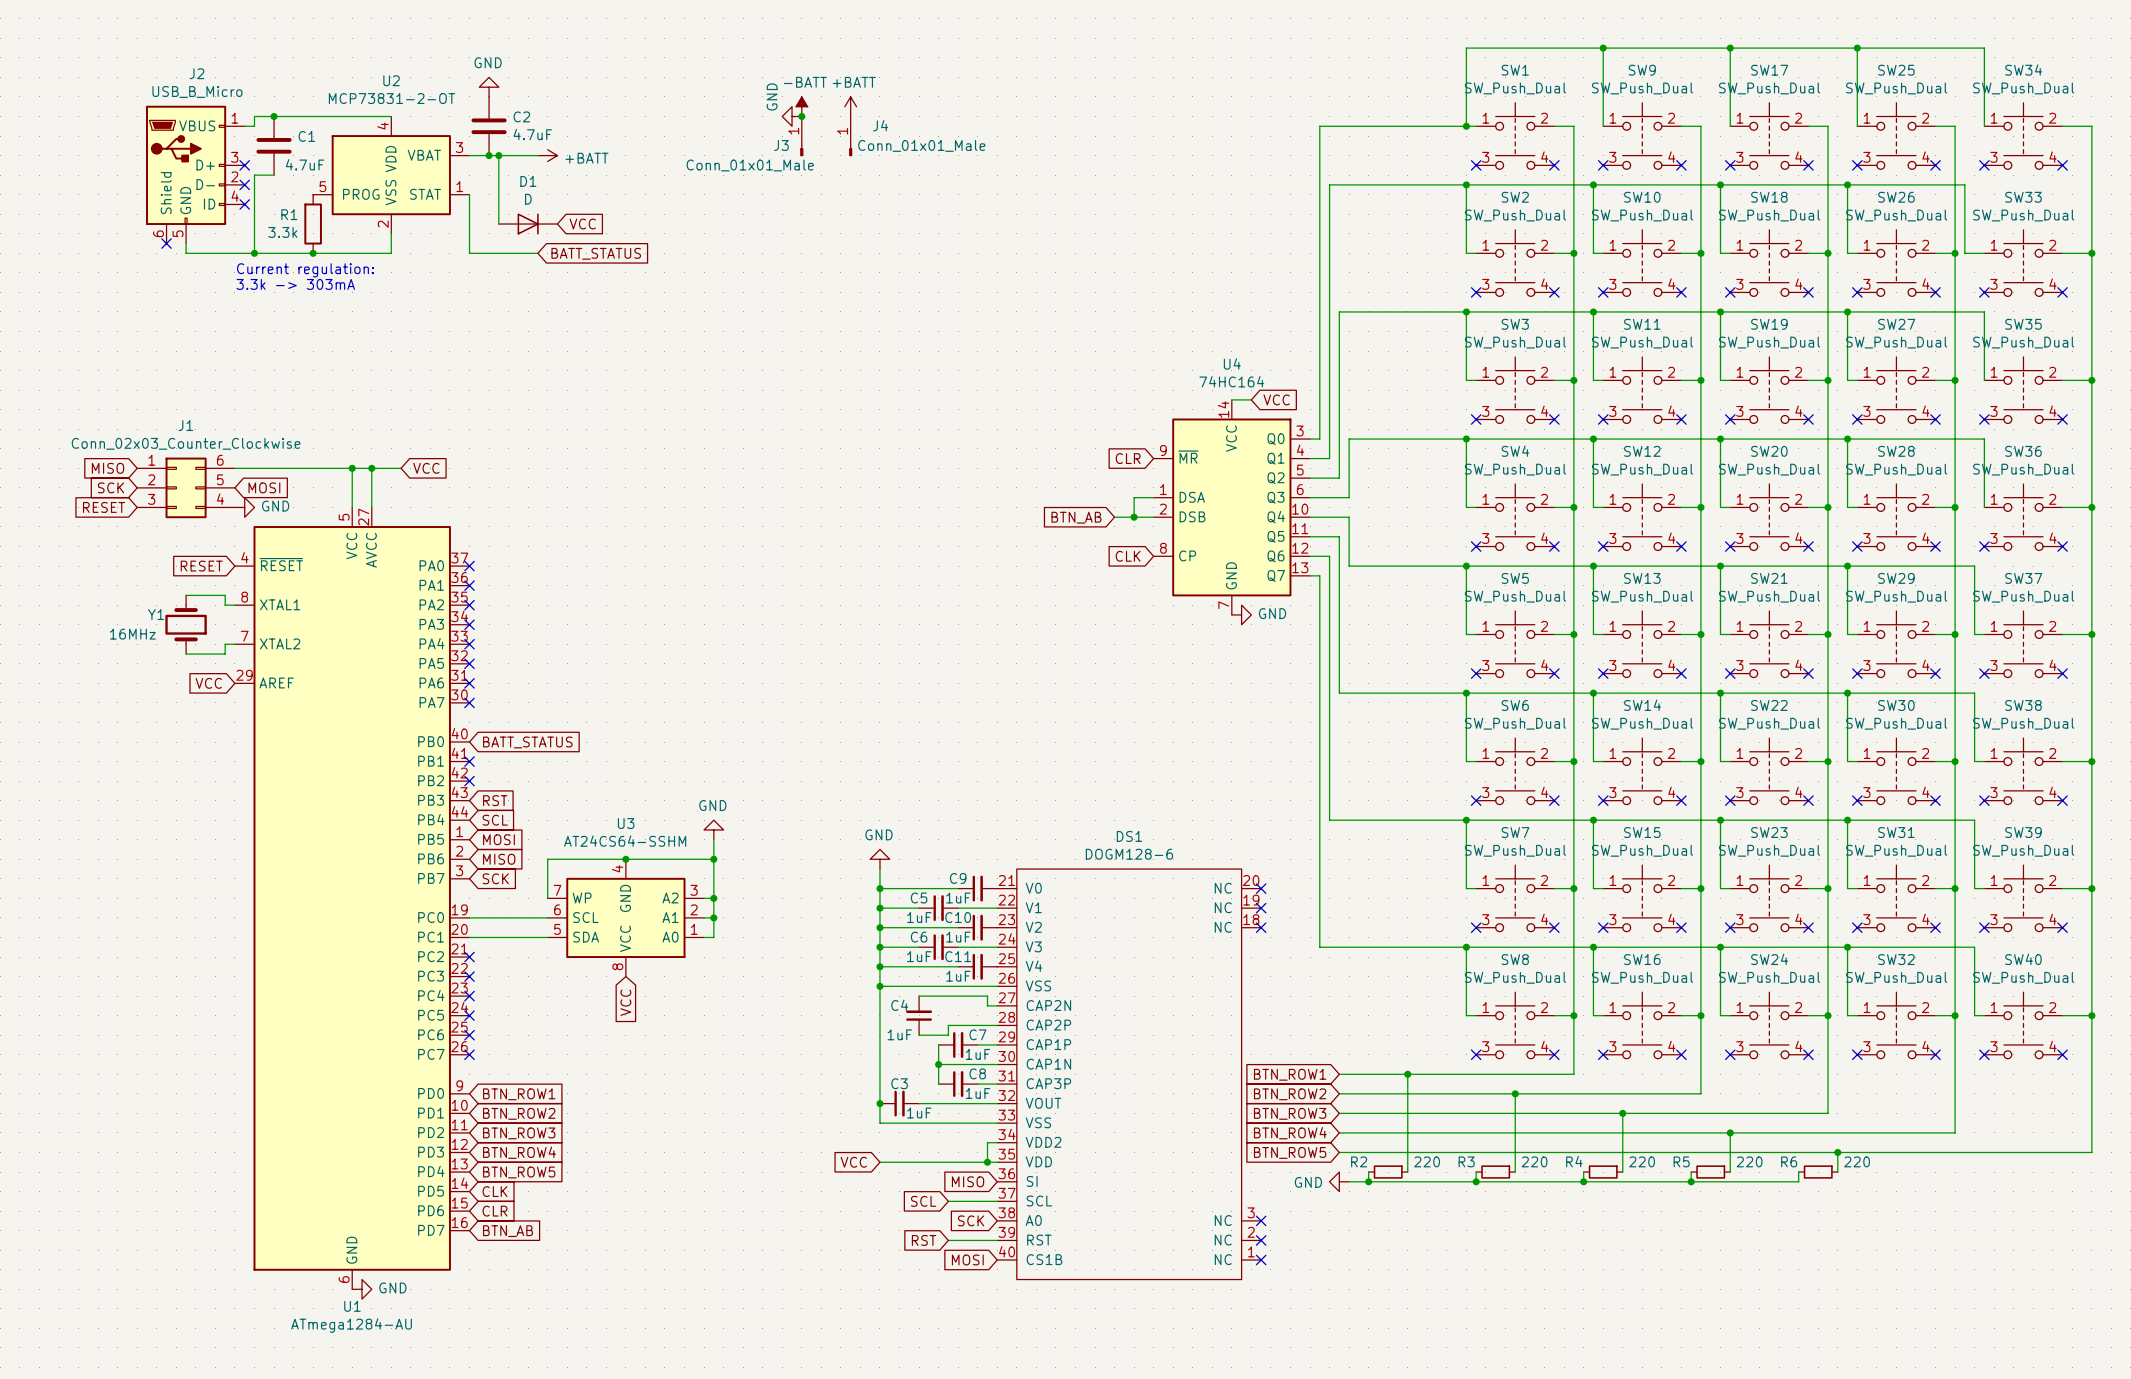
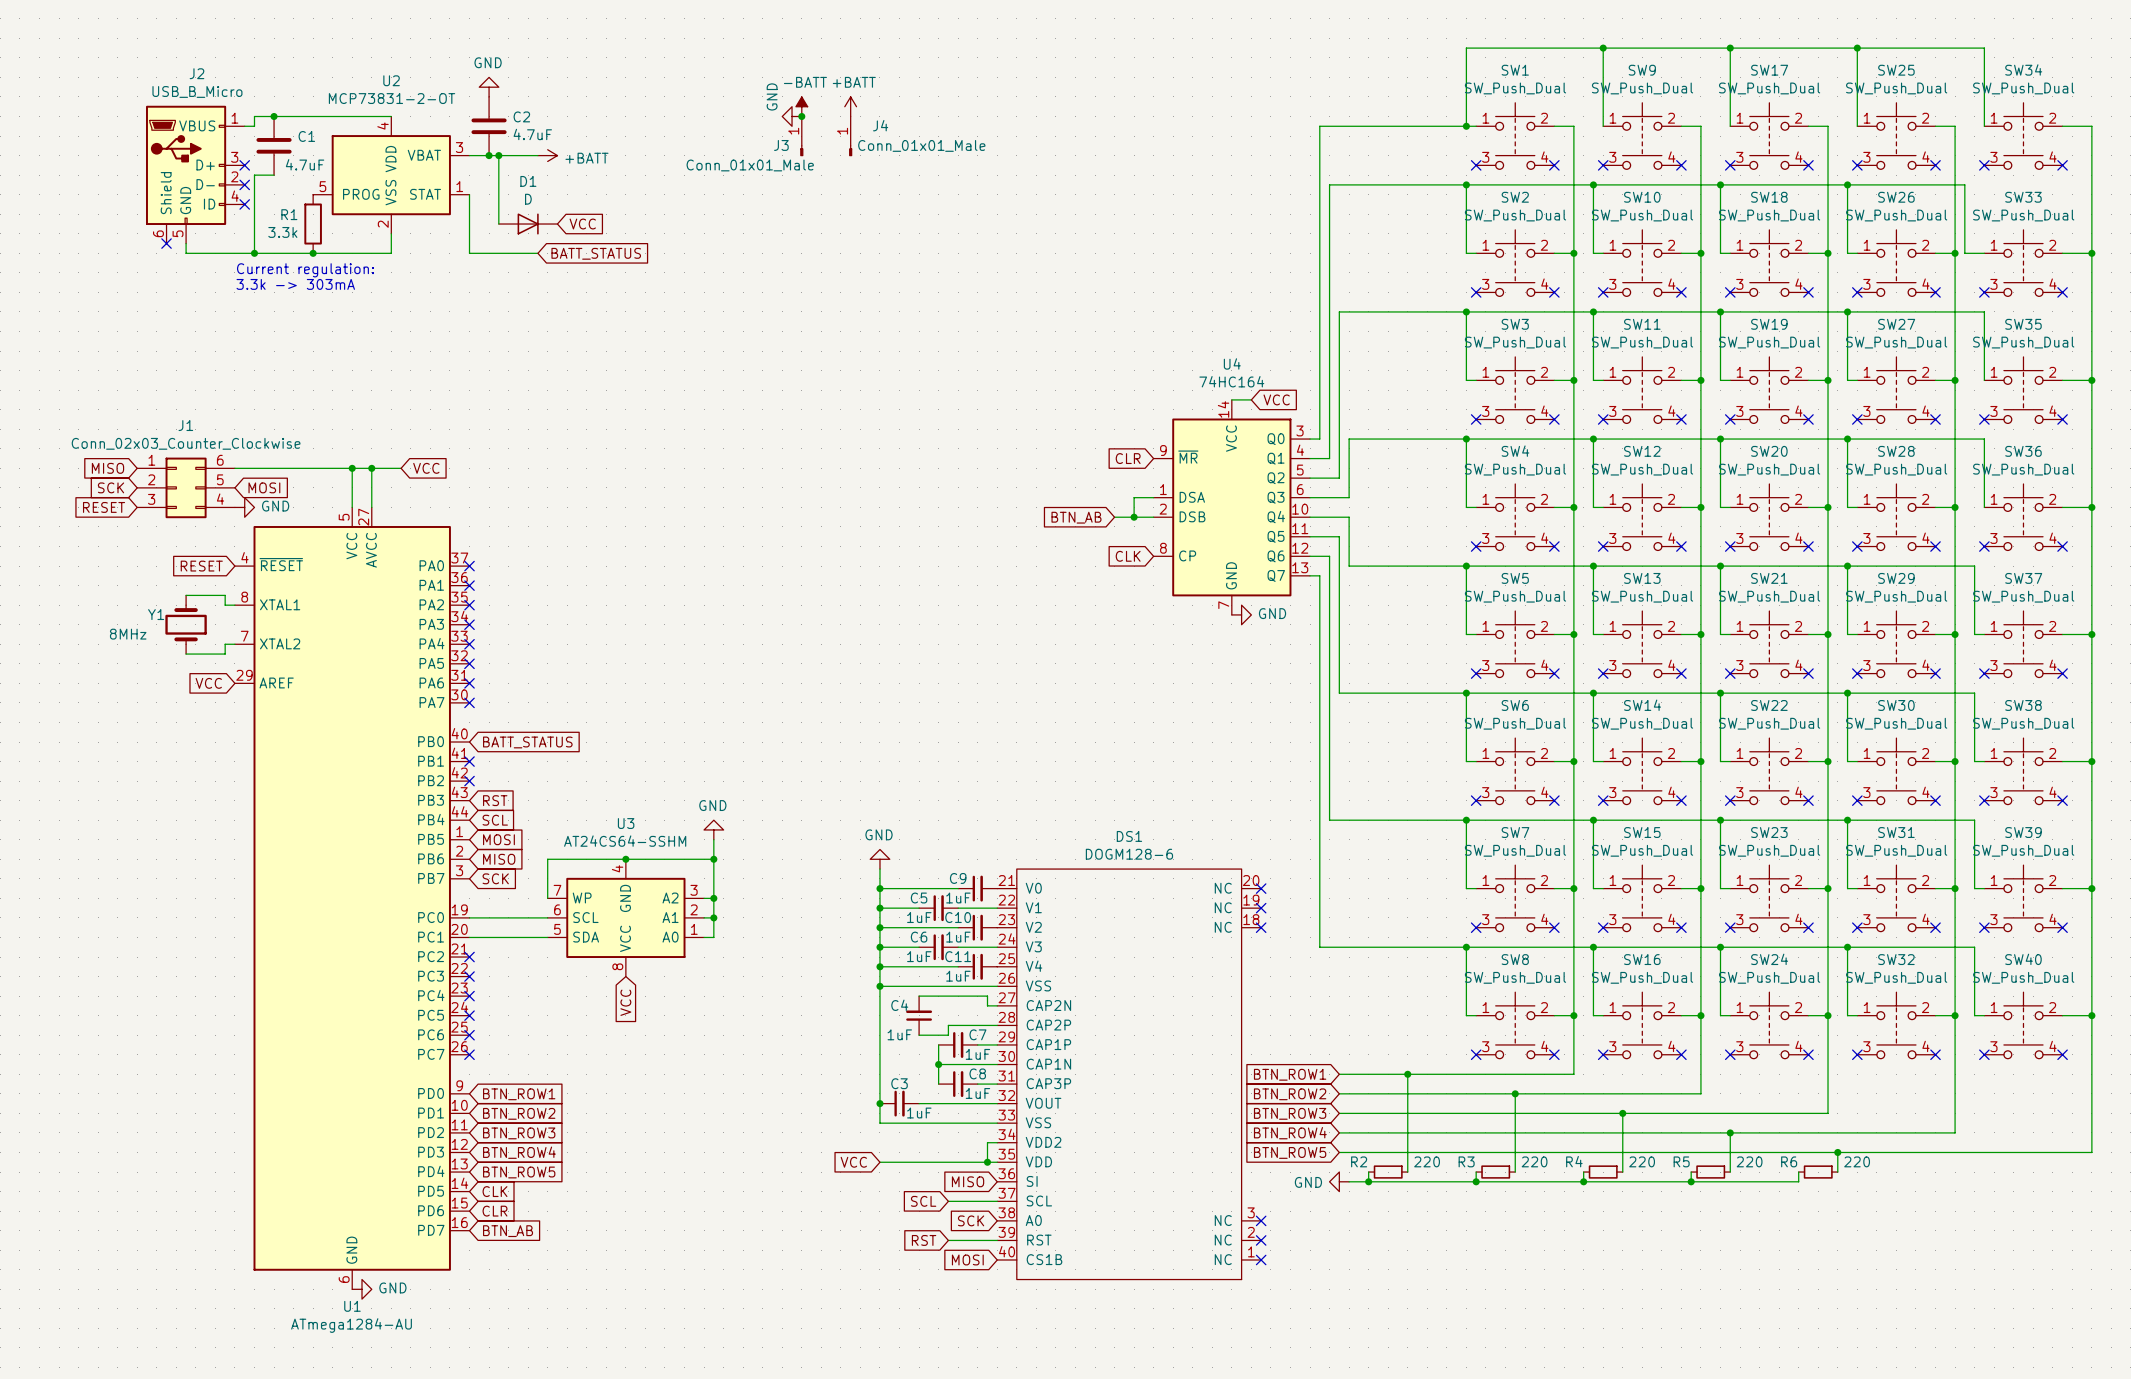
Y1 value: 16MHz (132, 634) -> 8MHz (128, 634)

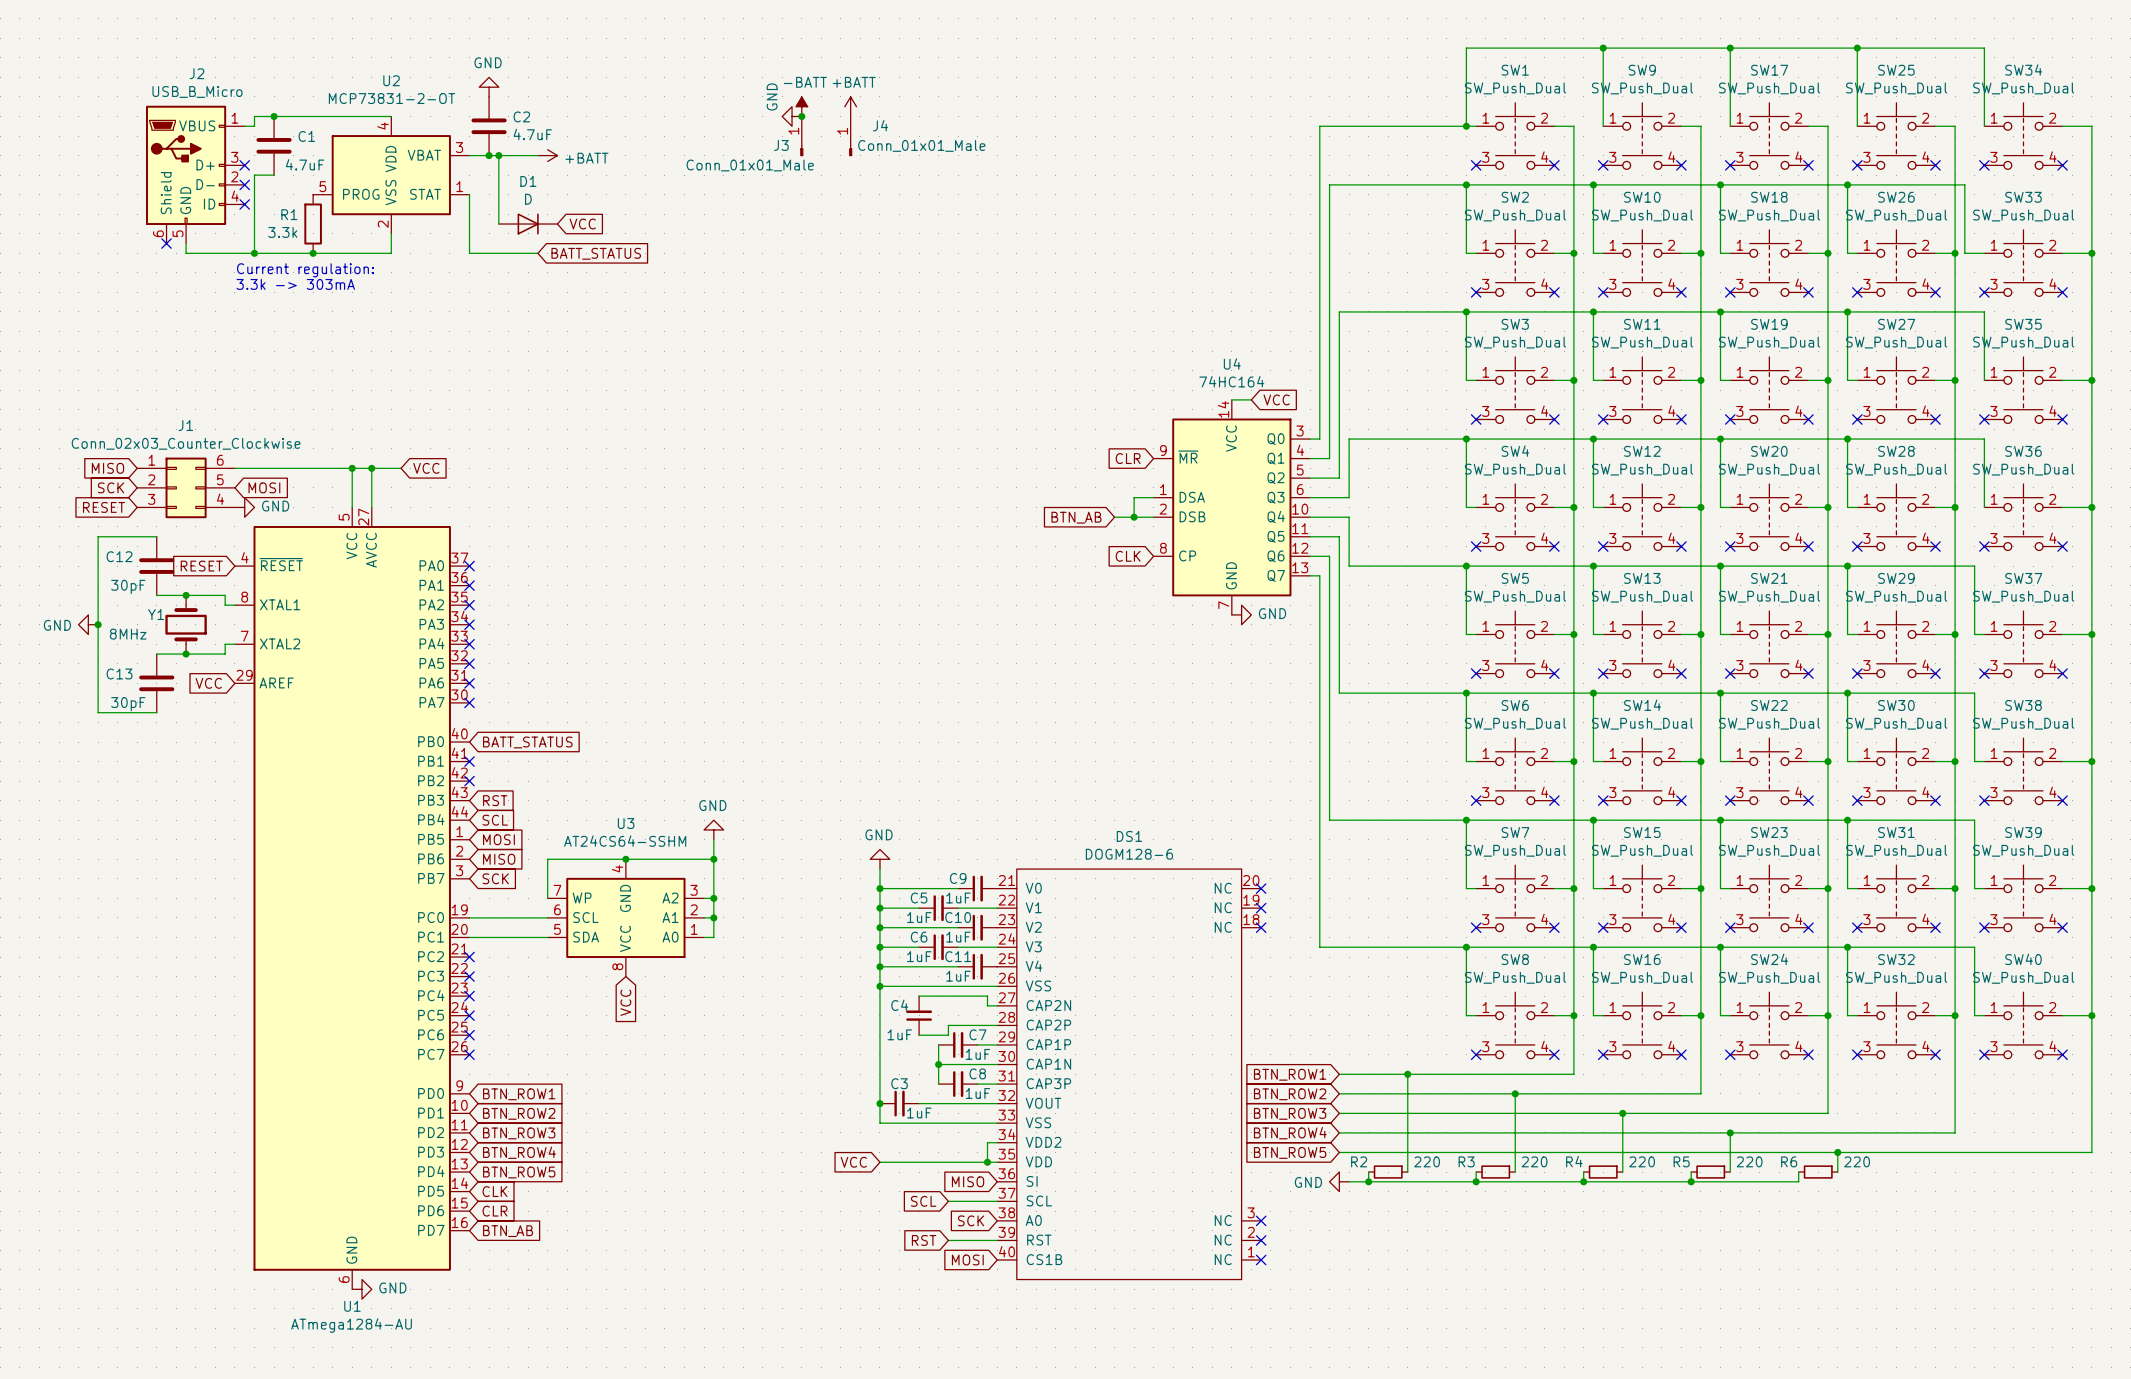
wire: none -> (156, 536) (98, 536) (98, 712) (156, 712)
C12: none -> 30pF (156, 566)
wire: none -> (156, 595) (186, 595)
junction: none -> (186, 595)
power symbol: none -> GND (88, 624)
junction: none -> (98, 624)
wire: none -> (156, 654) (186, 654)
junction: none -> (186, 654)
C13: none -> 30pF (156, 683)

